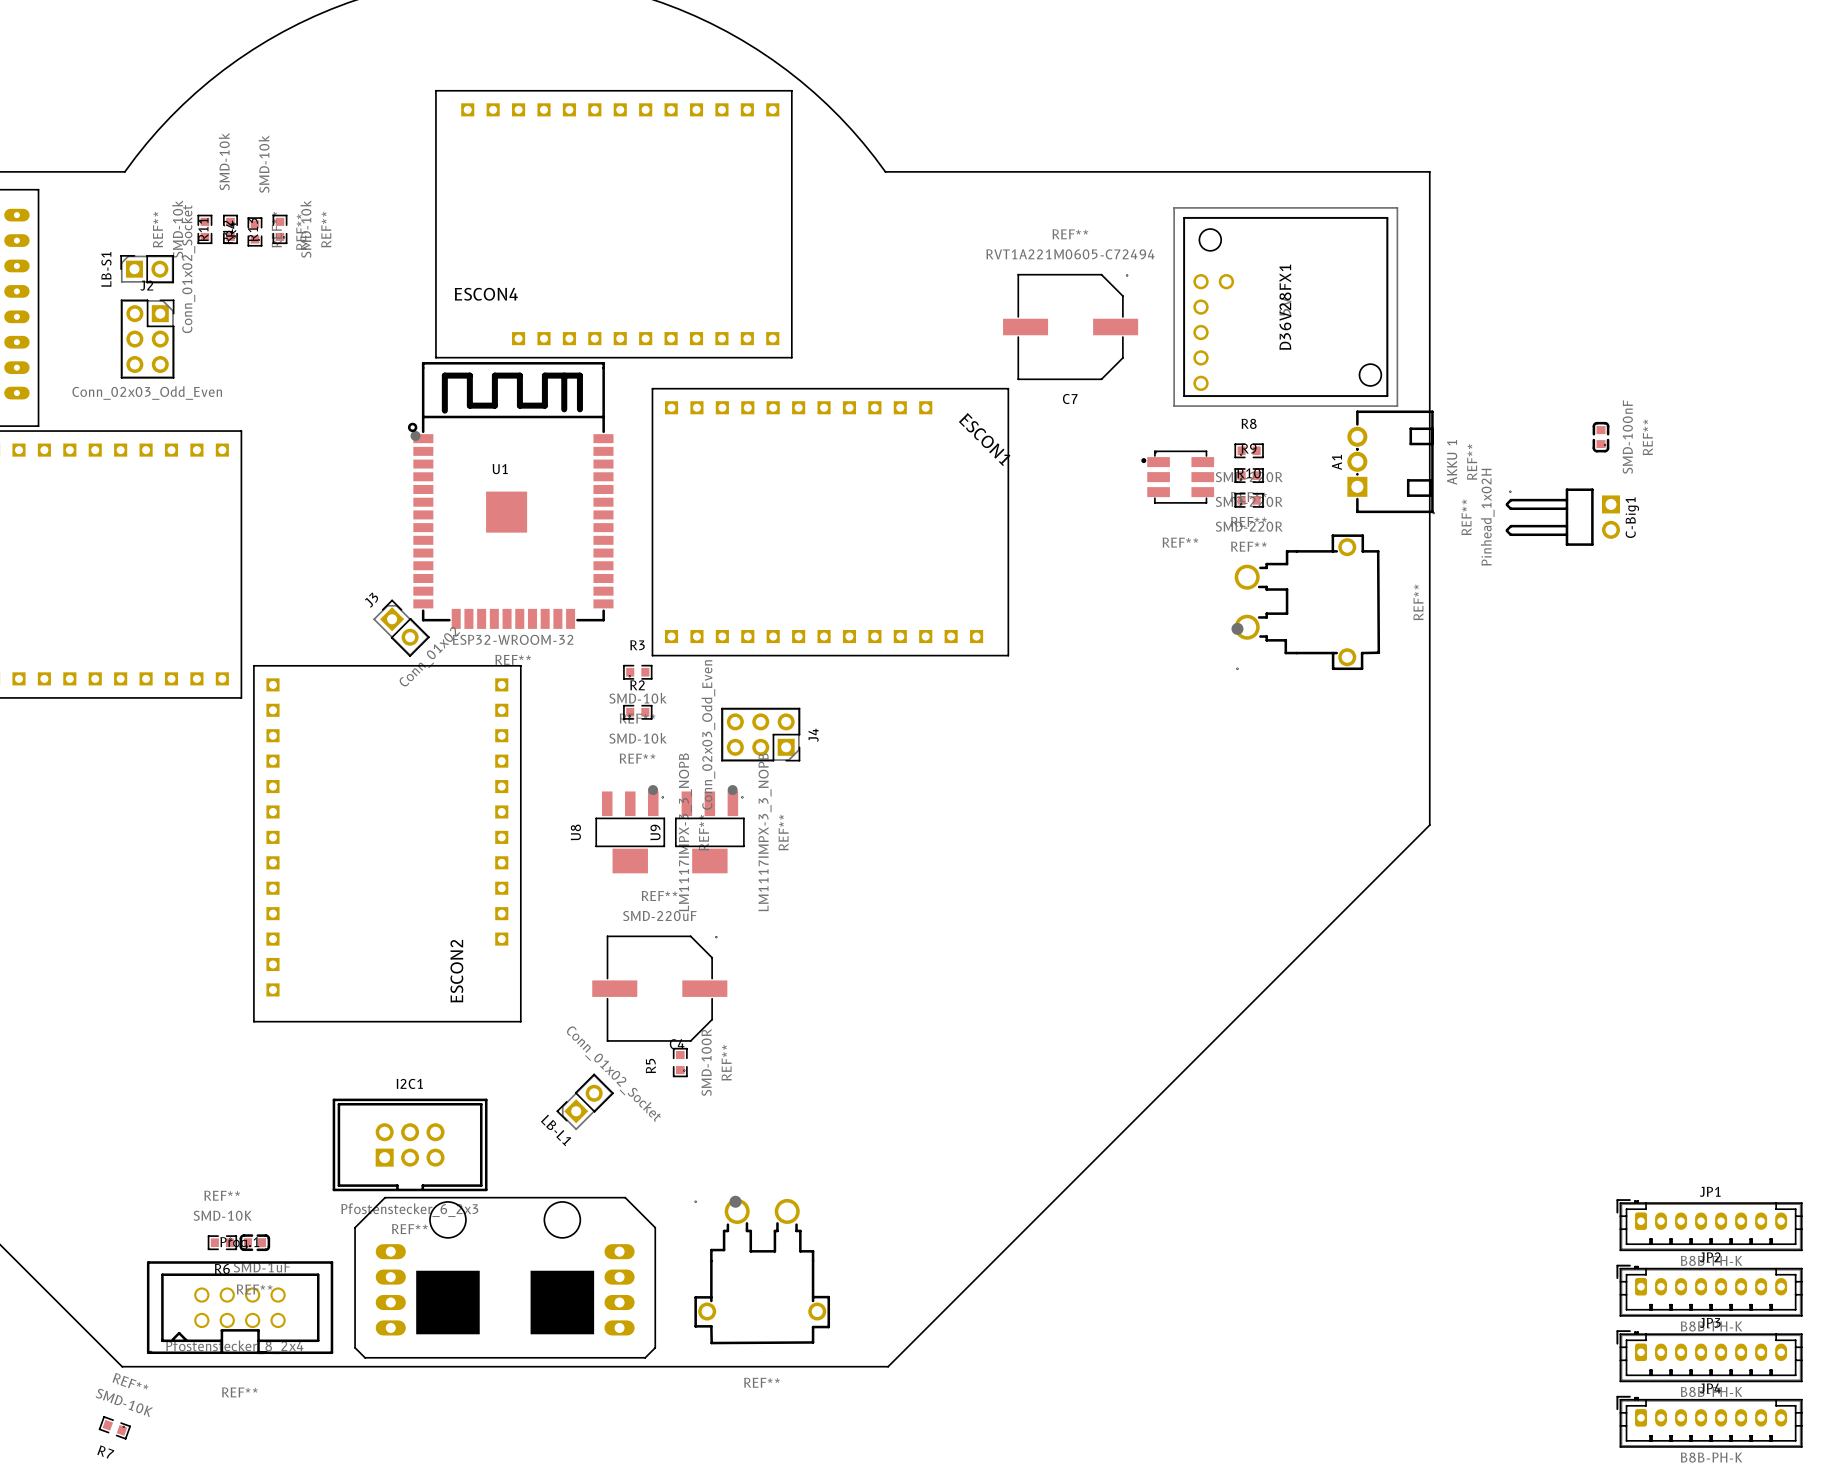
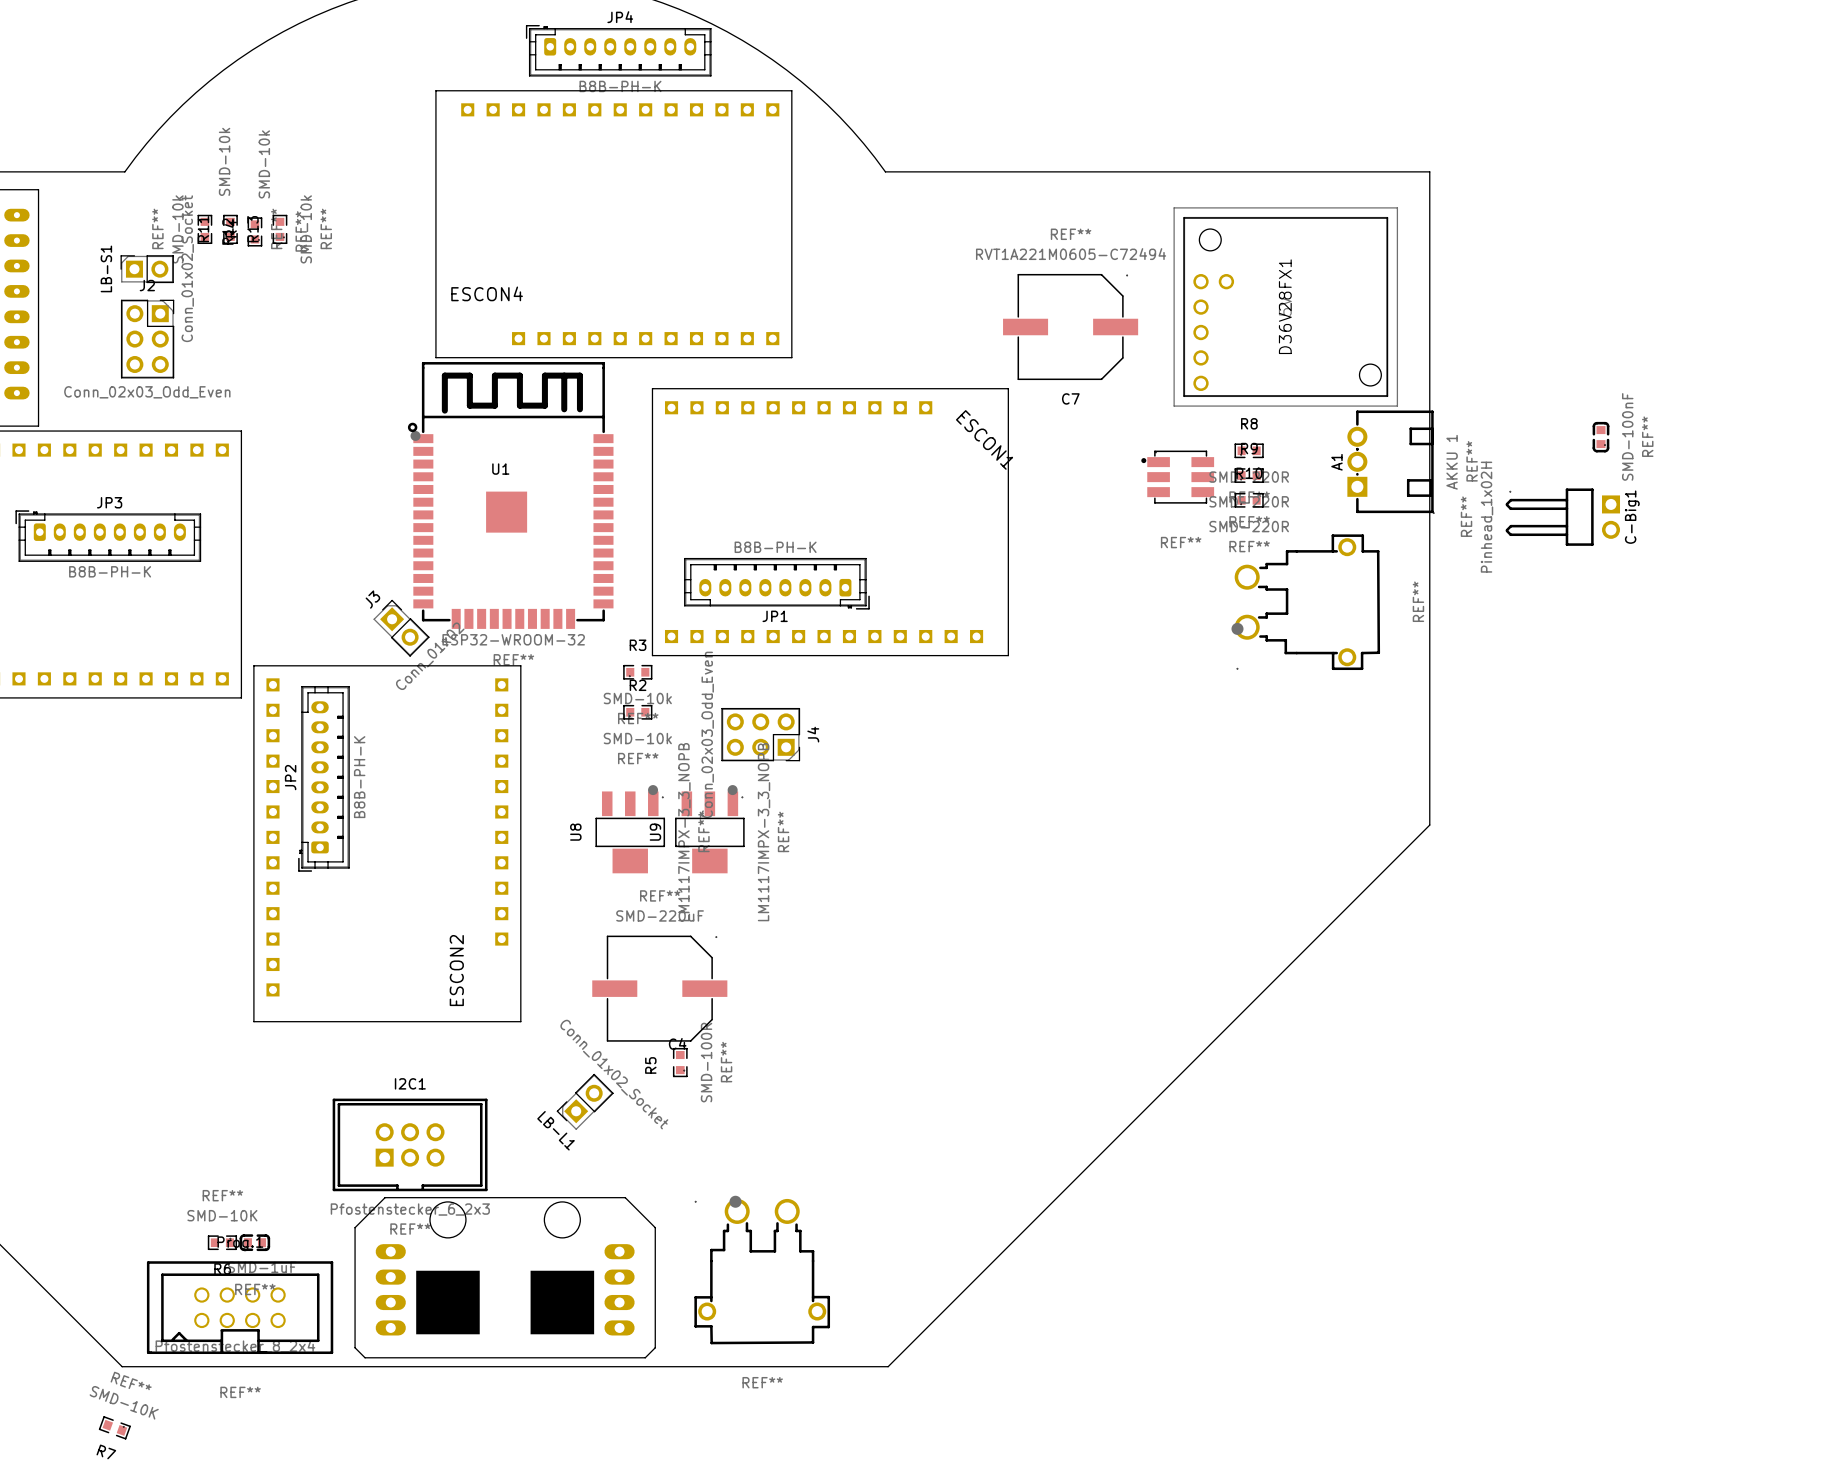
JP1 rotation: 0° (1709, 1225) -> 180° (776, 583)
JP1 position: (1709, 1225) -> (776, 583)
JP2 rotation: 0° (1709, 1290) -> 90° counterclockwise (324, 778)
JP2 position: (1709, 1290) -> (324, 778)
JP3 position: (1709, 1356) -> (108, 536)
JP4 position: (1709, 1421) -> (618, 50)

